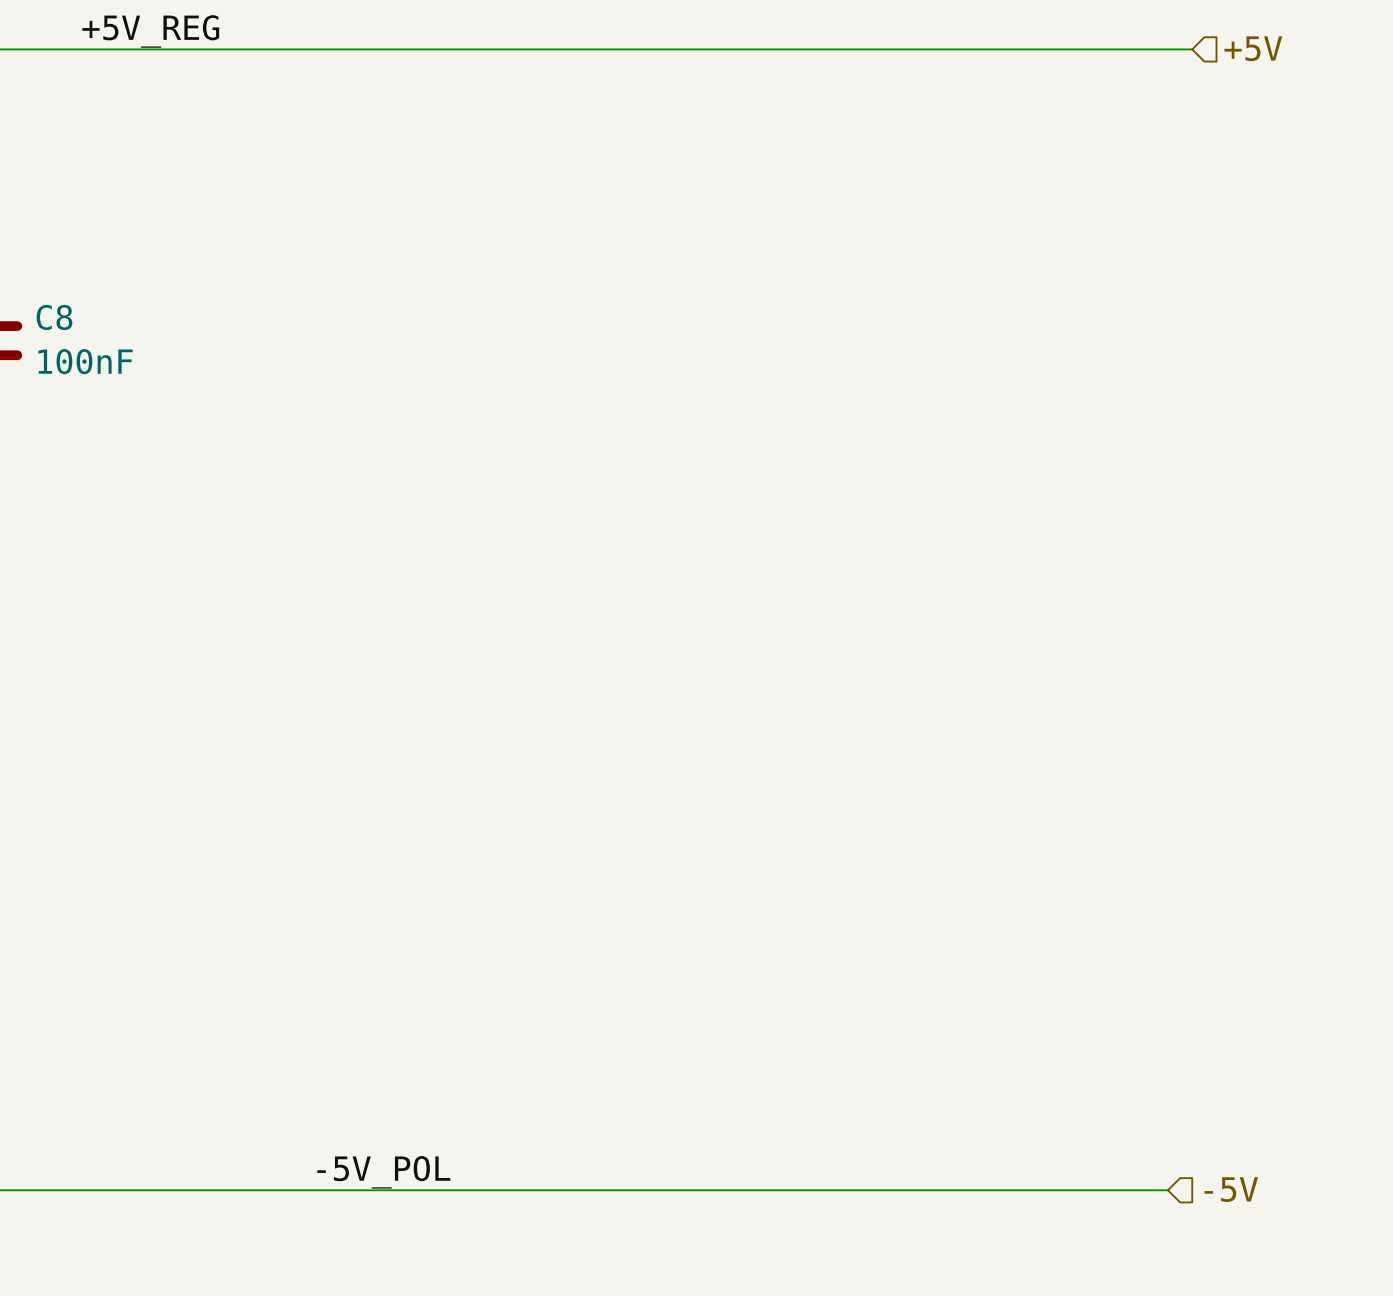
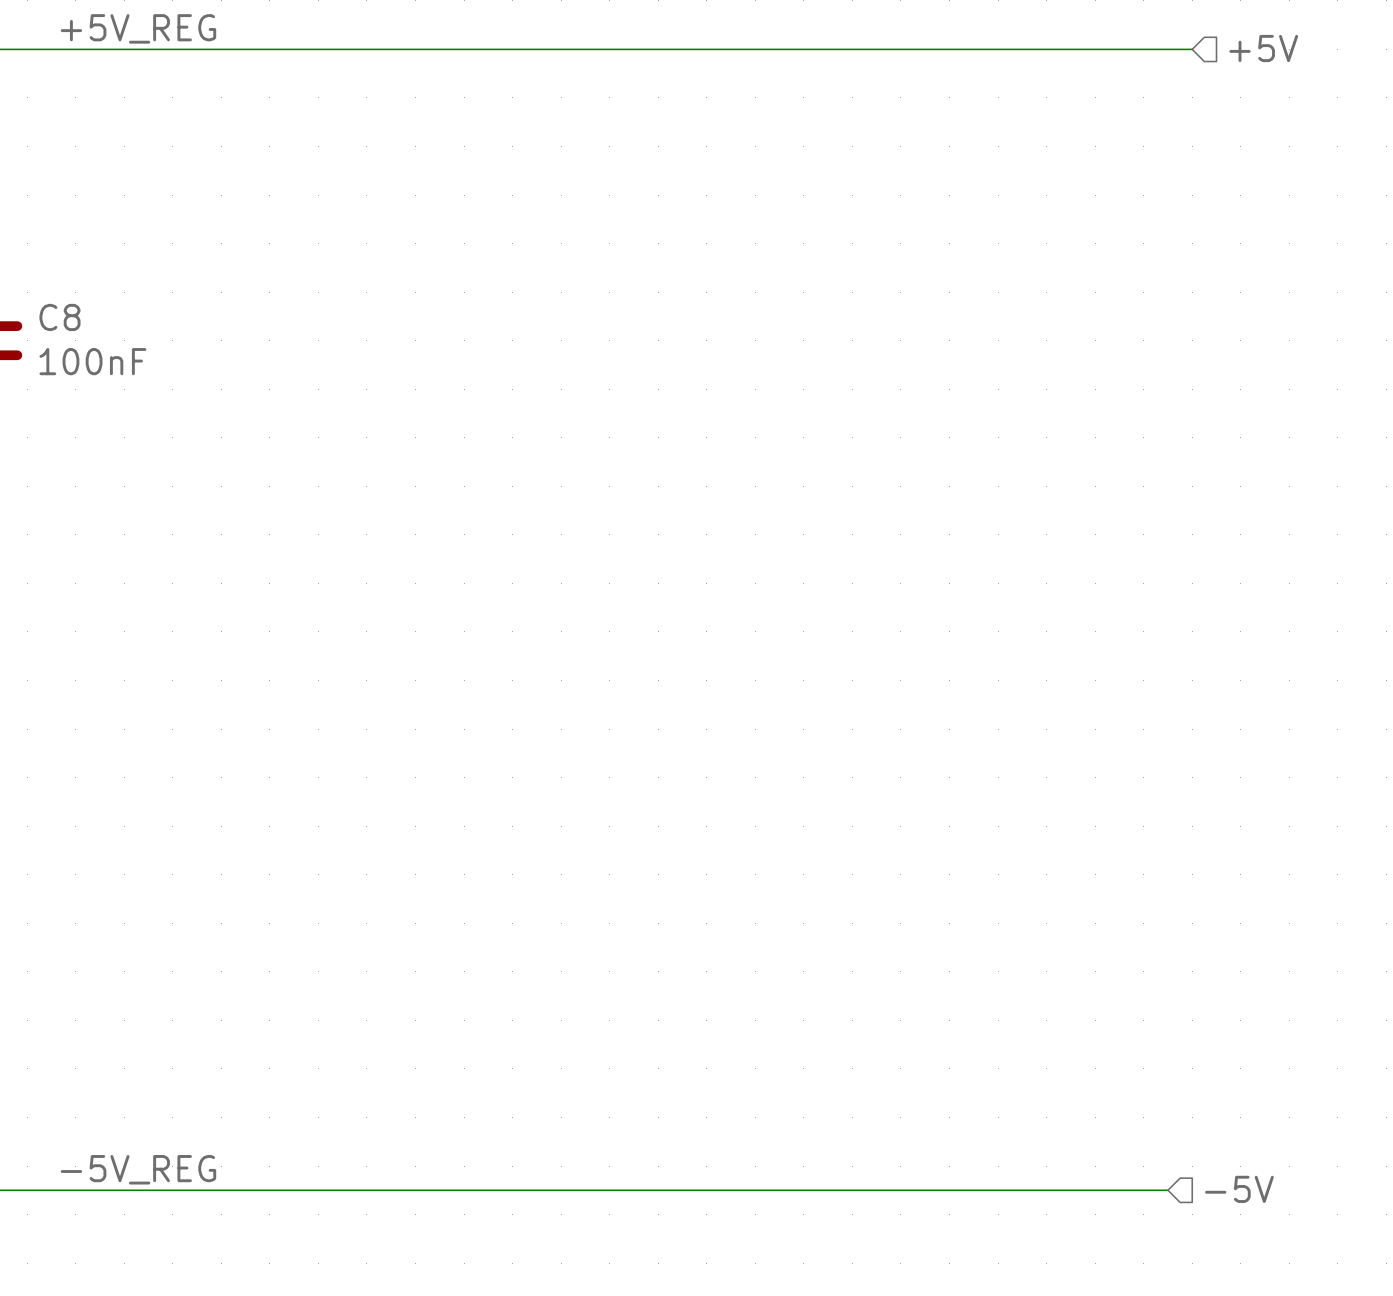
label: none -> -5V_REG (138, 1169)
label: -5V_POL (383, 1172) -> none

